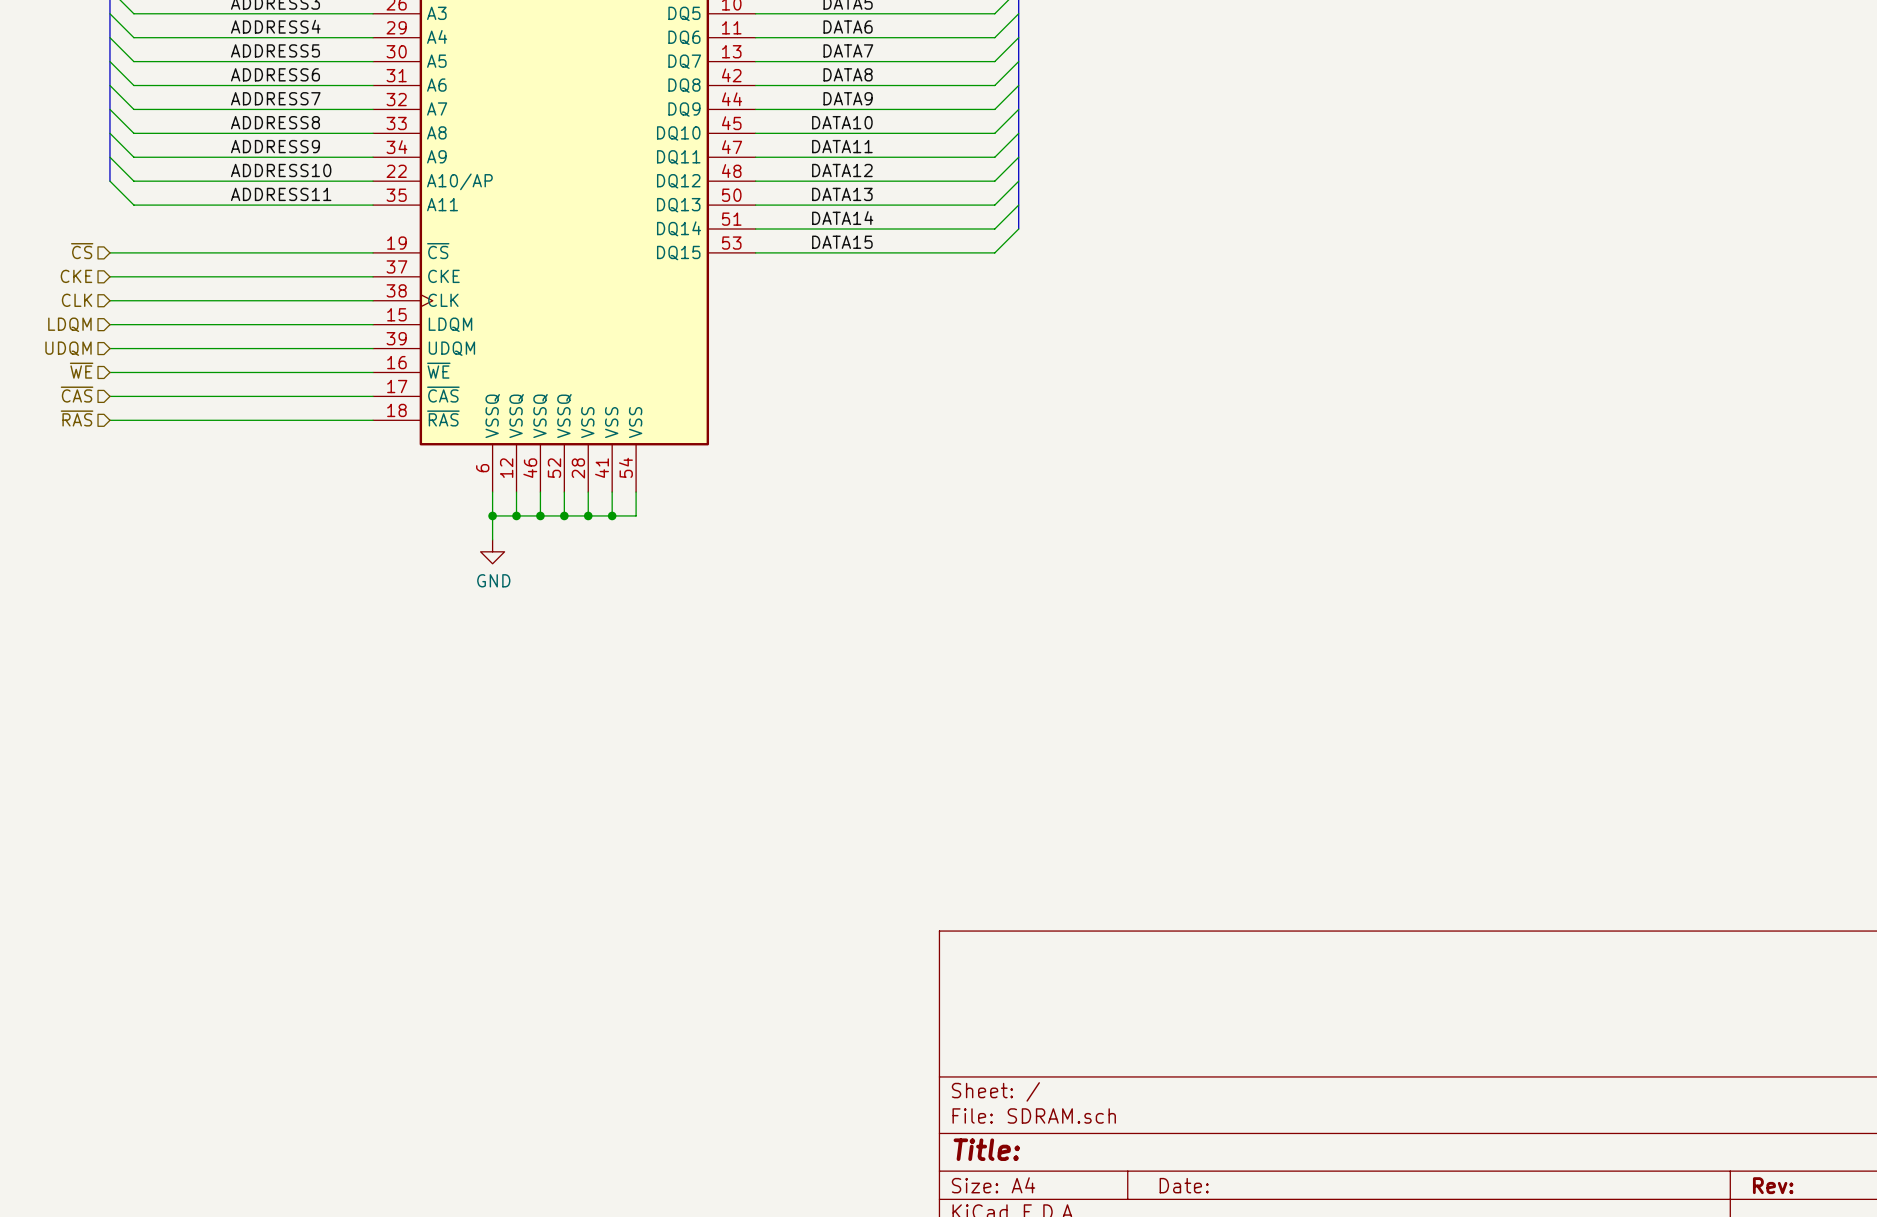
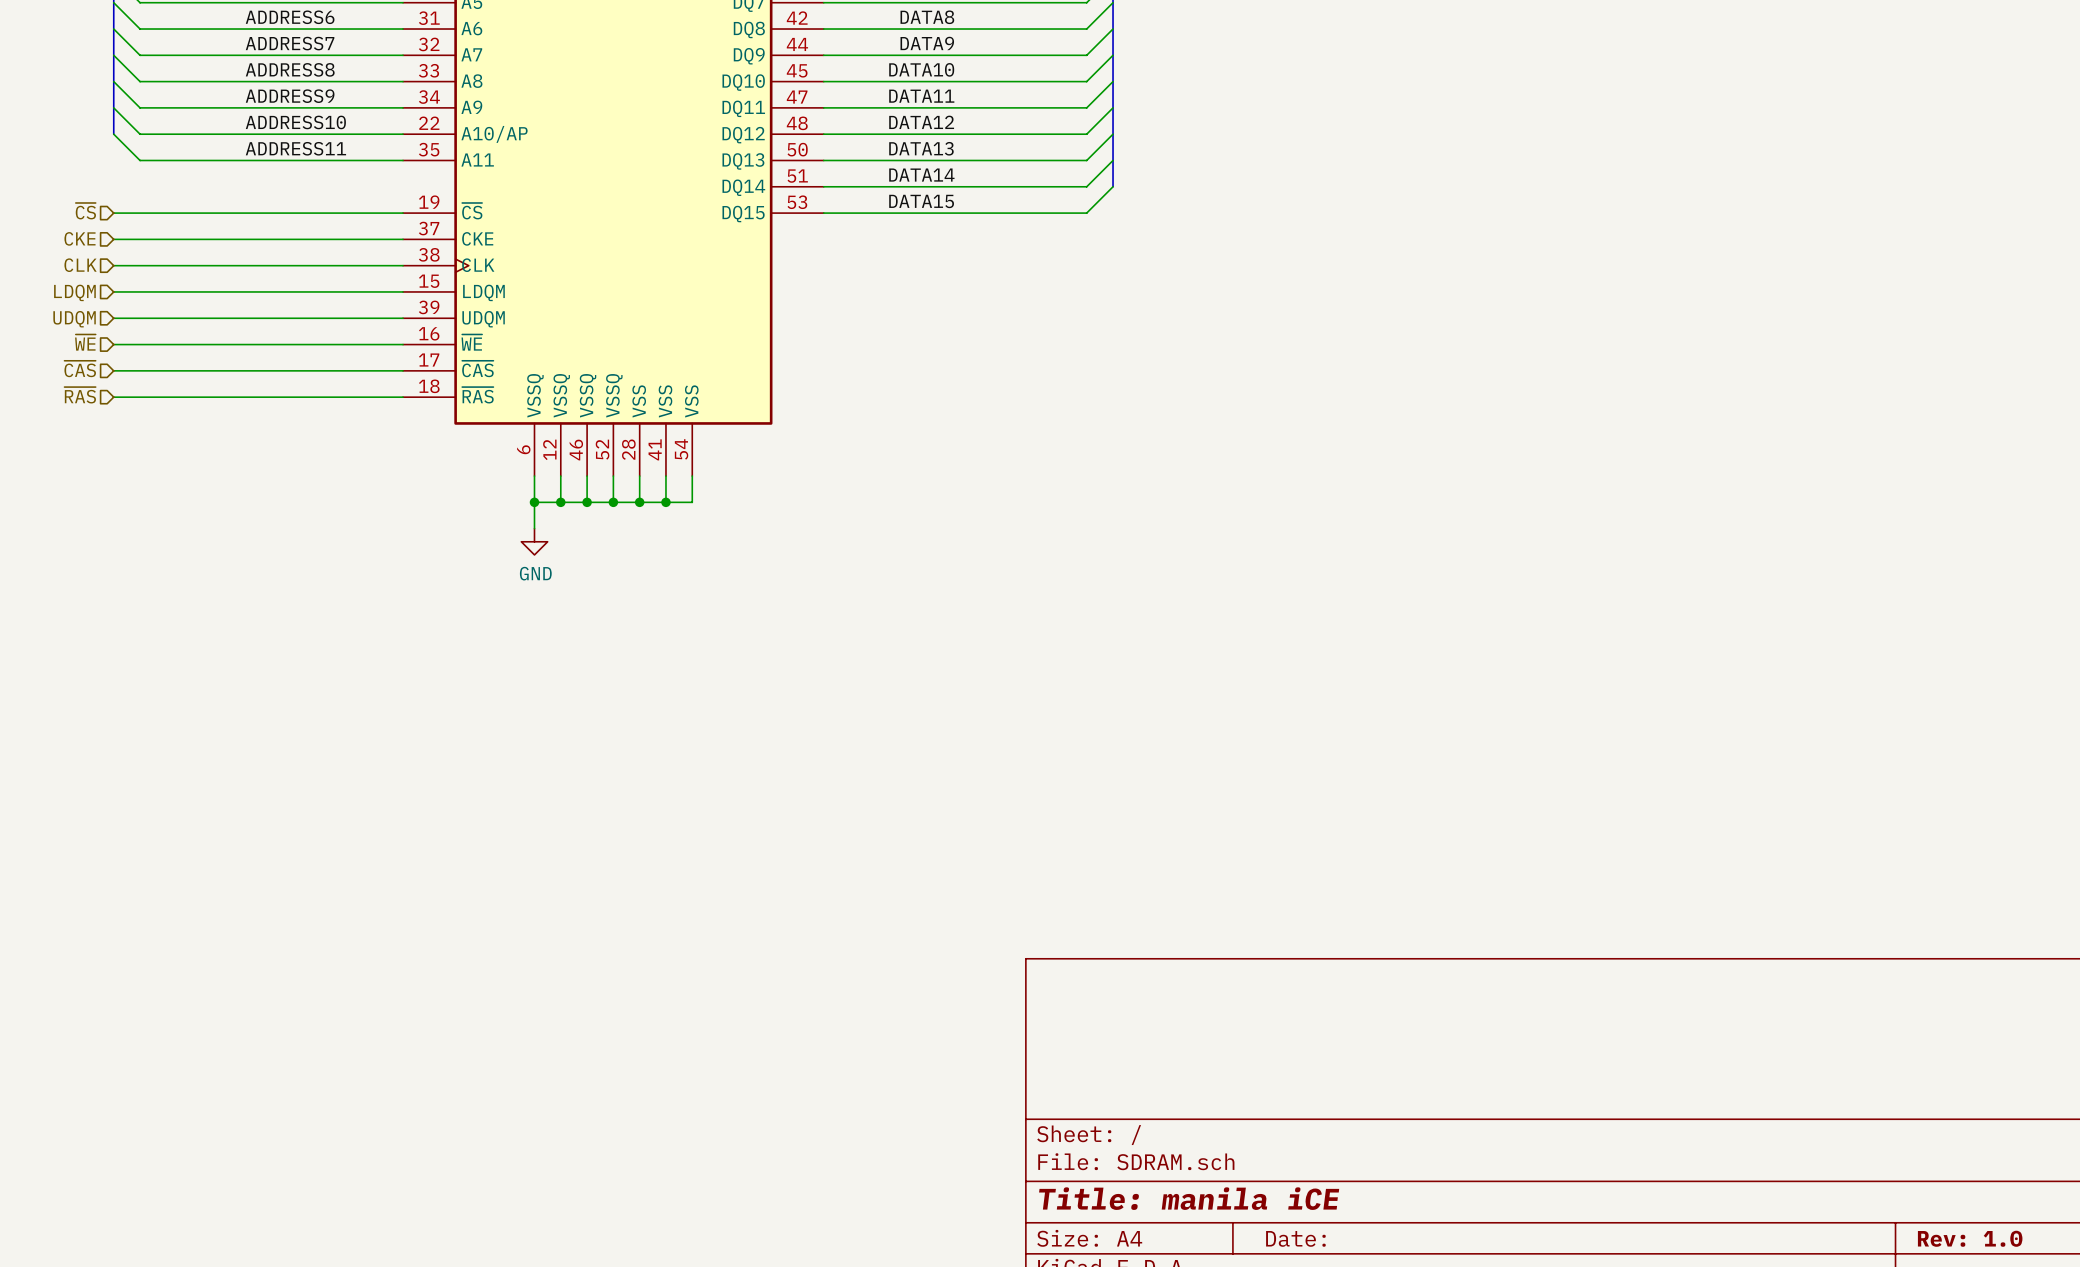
title block: Title: (986, 1149) -> Title: manila iCE (1189, 1198)
title block: Rev: (1773, 1185) -> Rev: 1.0 (1970, 1238)

